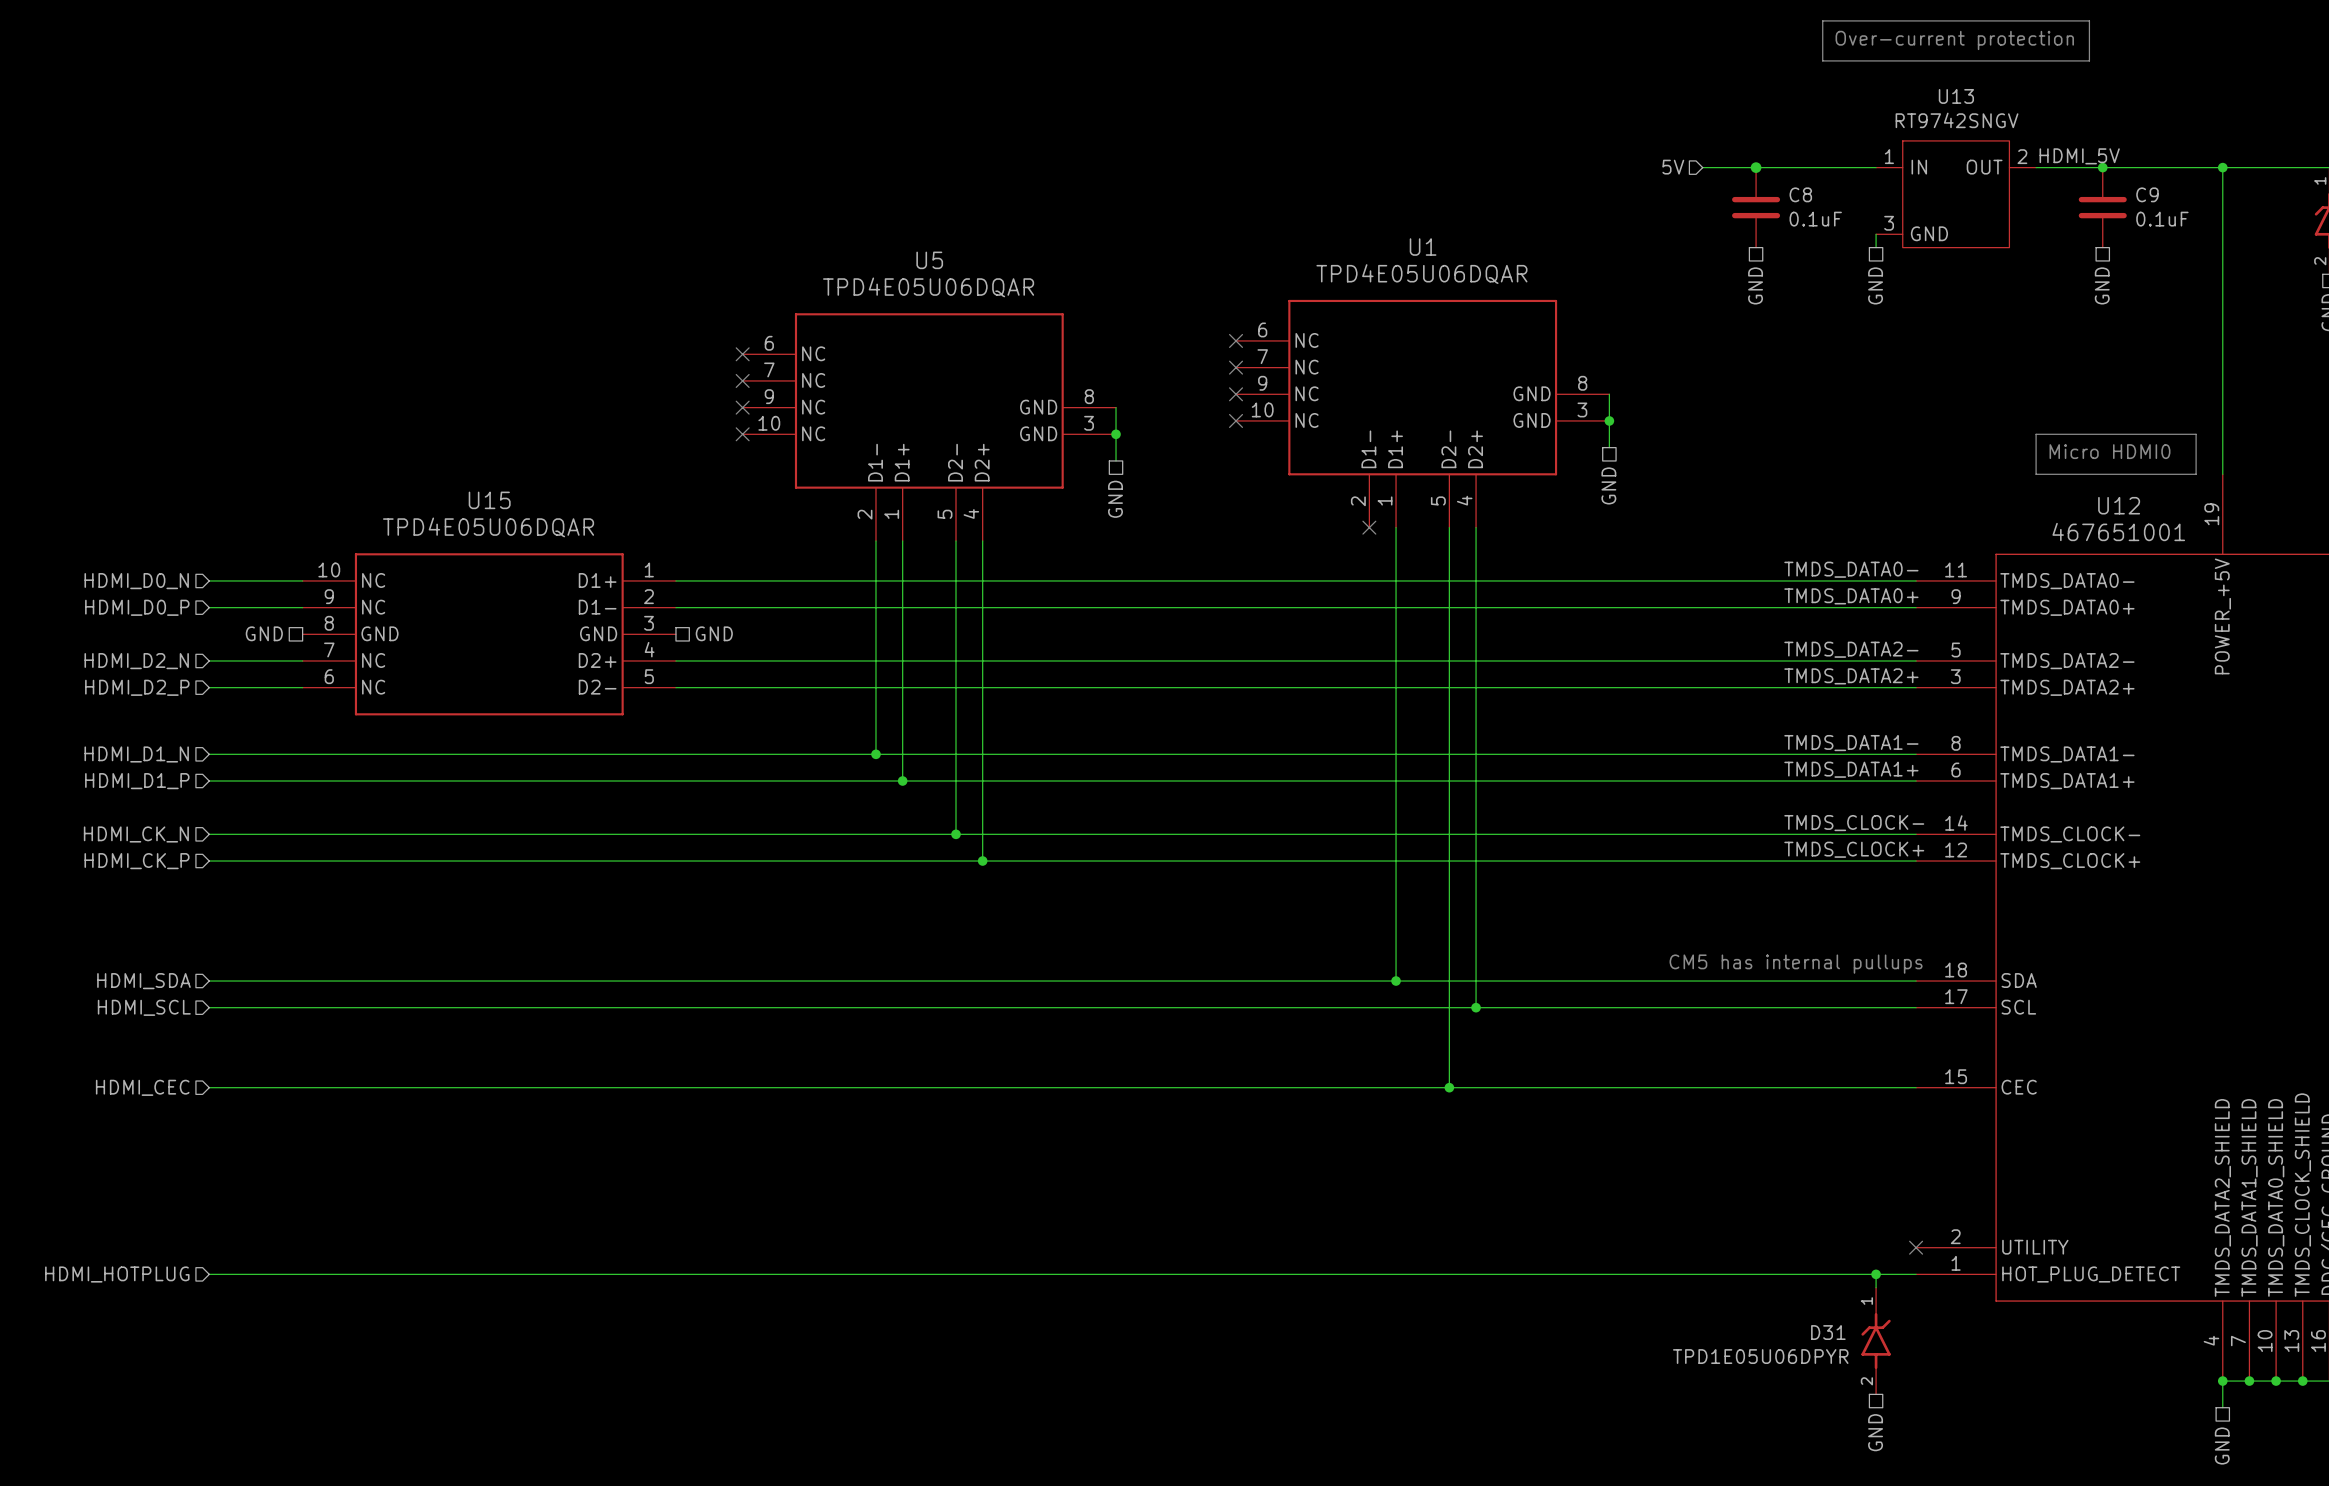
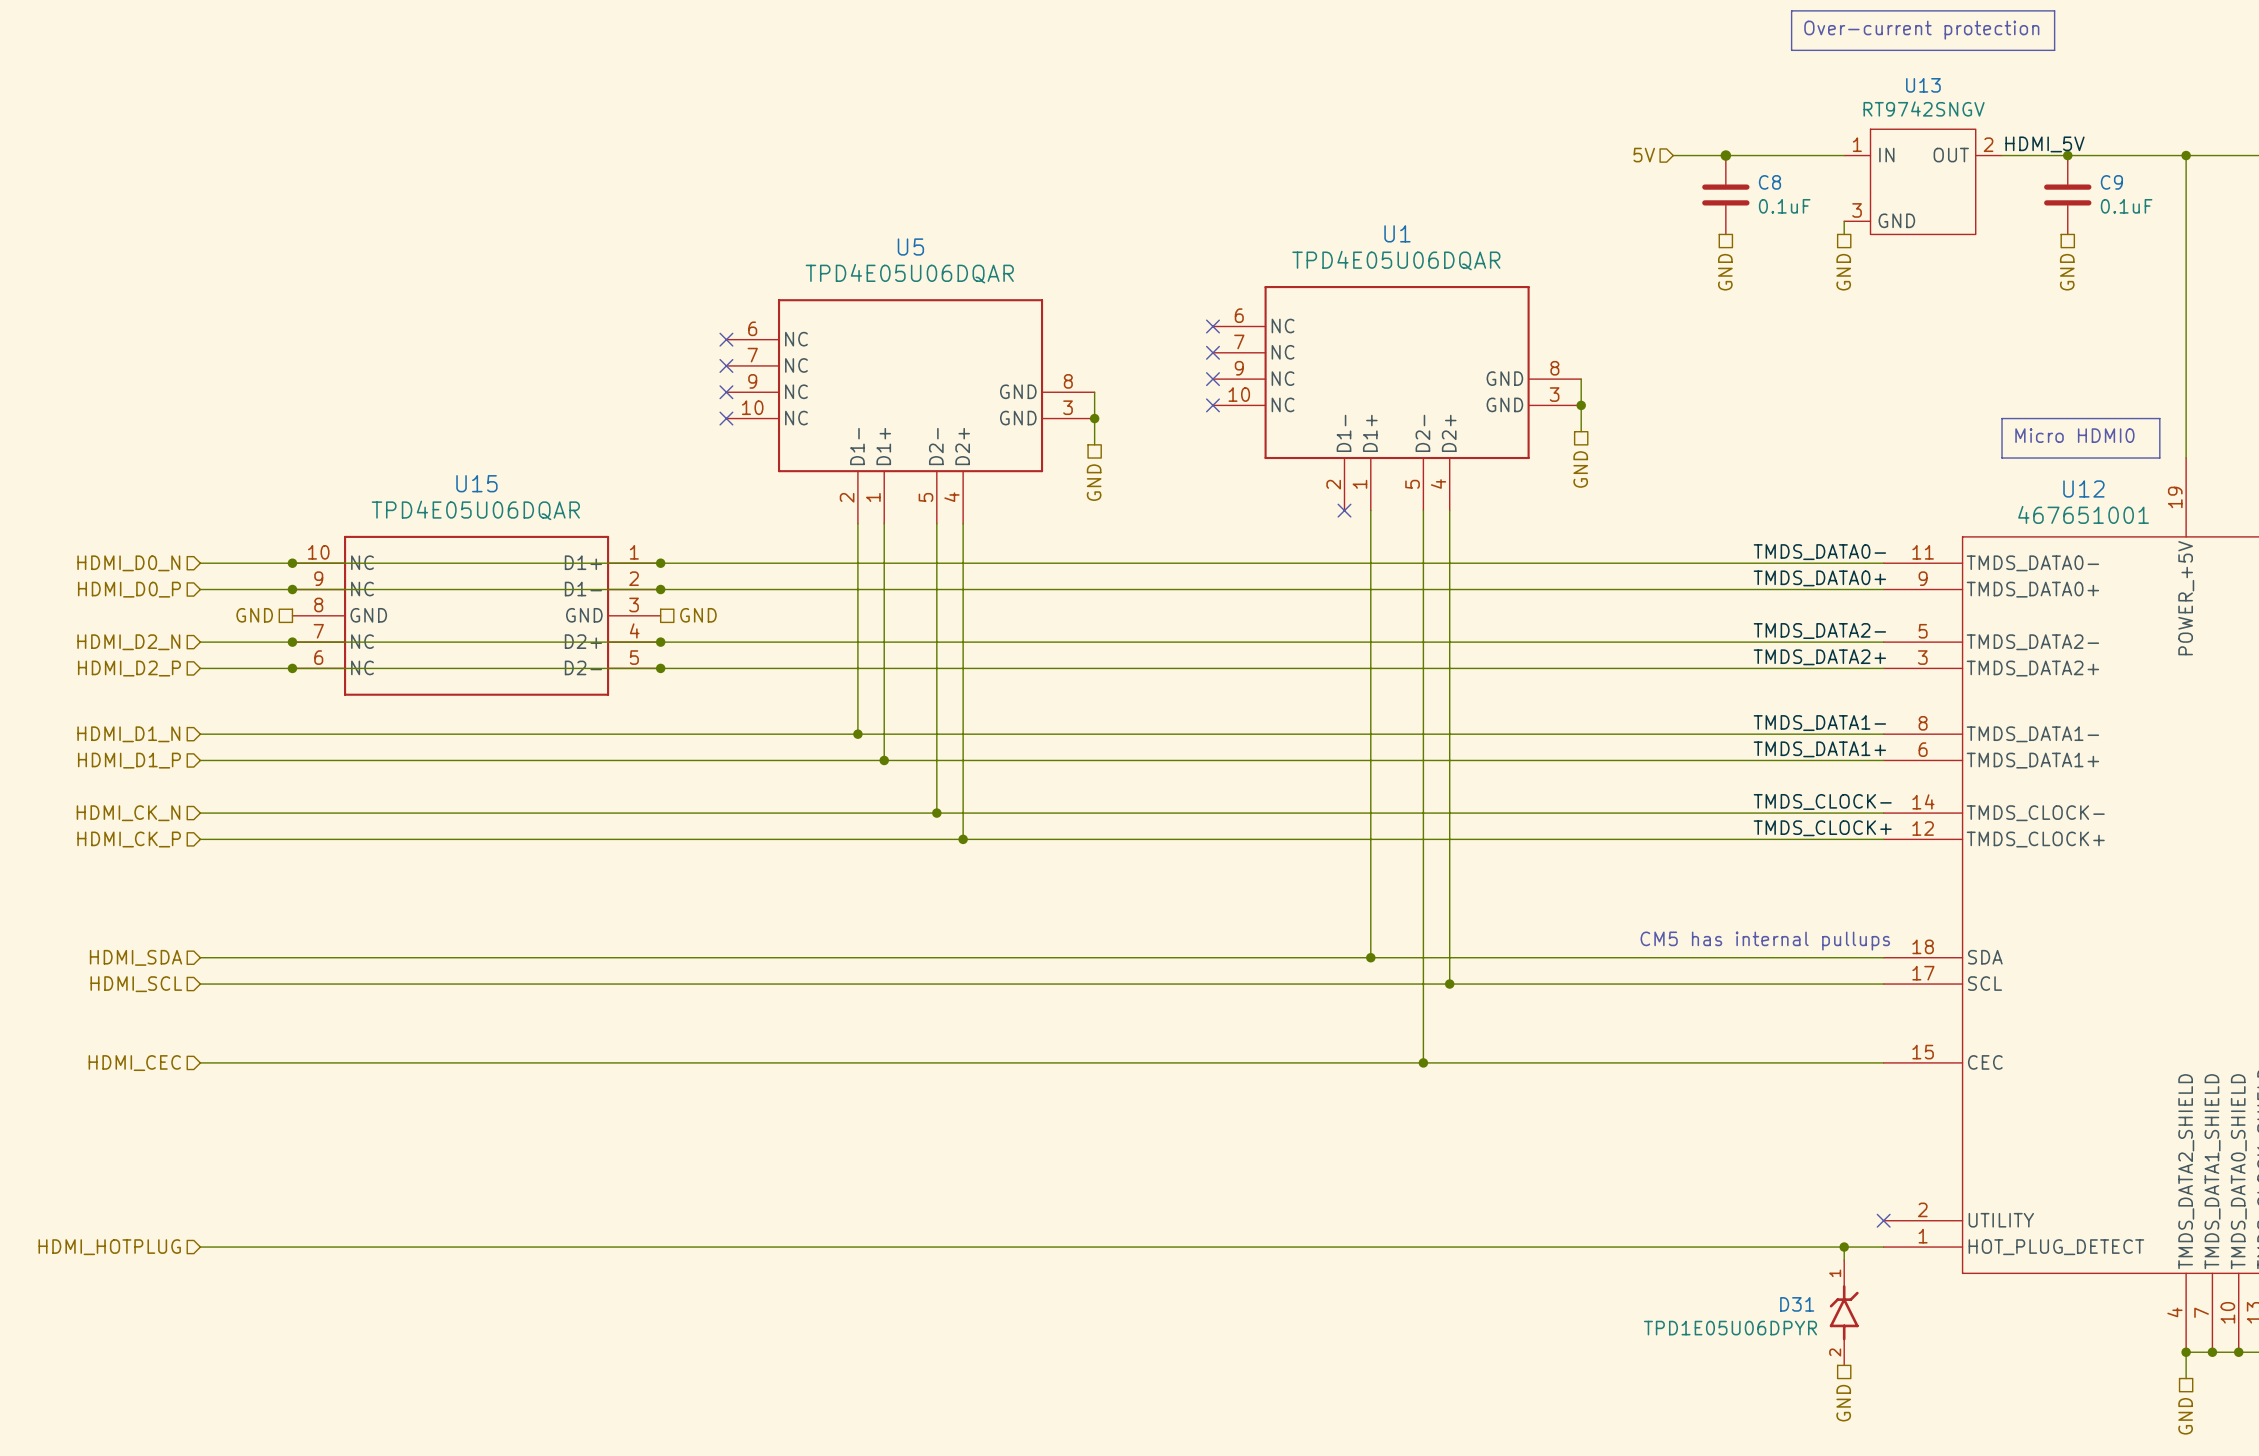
wire: none -> (292, 563) (660, 563)
junction: none -> (292, 563)
junction: none -> (660, 563)
wire: none -> (292, 589) (660, 589)
junction: none -> (292, 589)
junction: none -> (660, 589)
wire: none -> (292, 642) (660, 642)
junction: none -> (292, 642)
junction: none -> (660, 642)
wire: none -> (292, 668) (660, 668)
junction: none -> (292, 668)
junction: none -> (660, 668)

